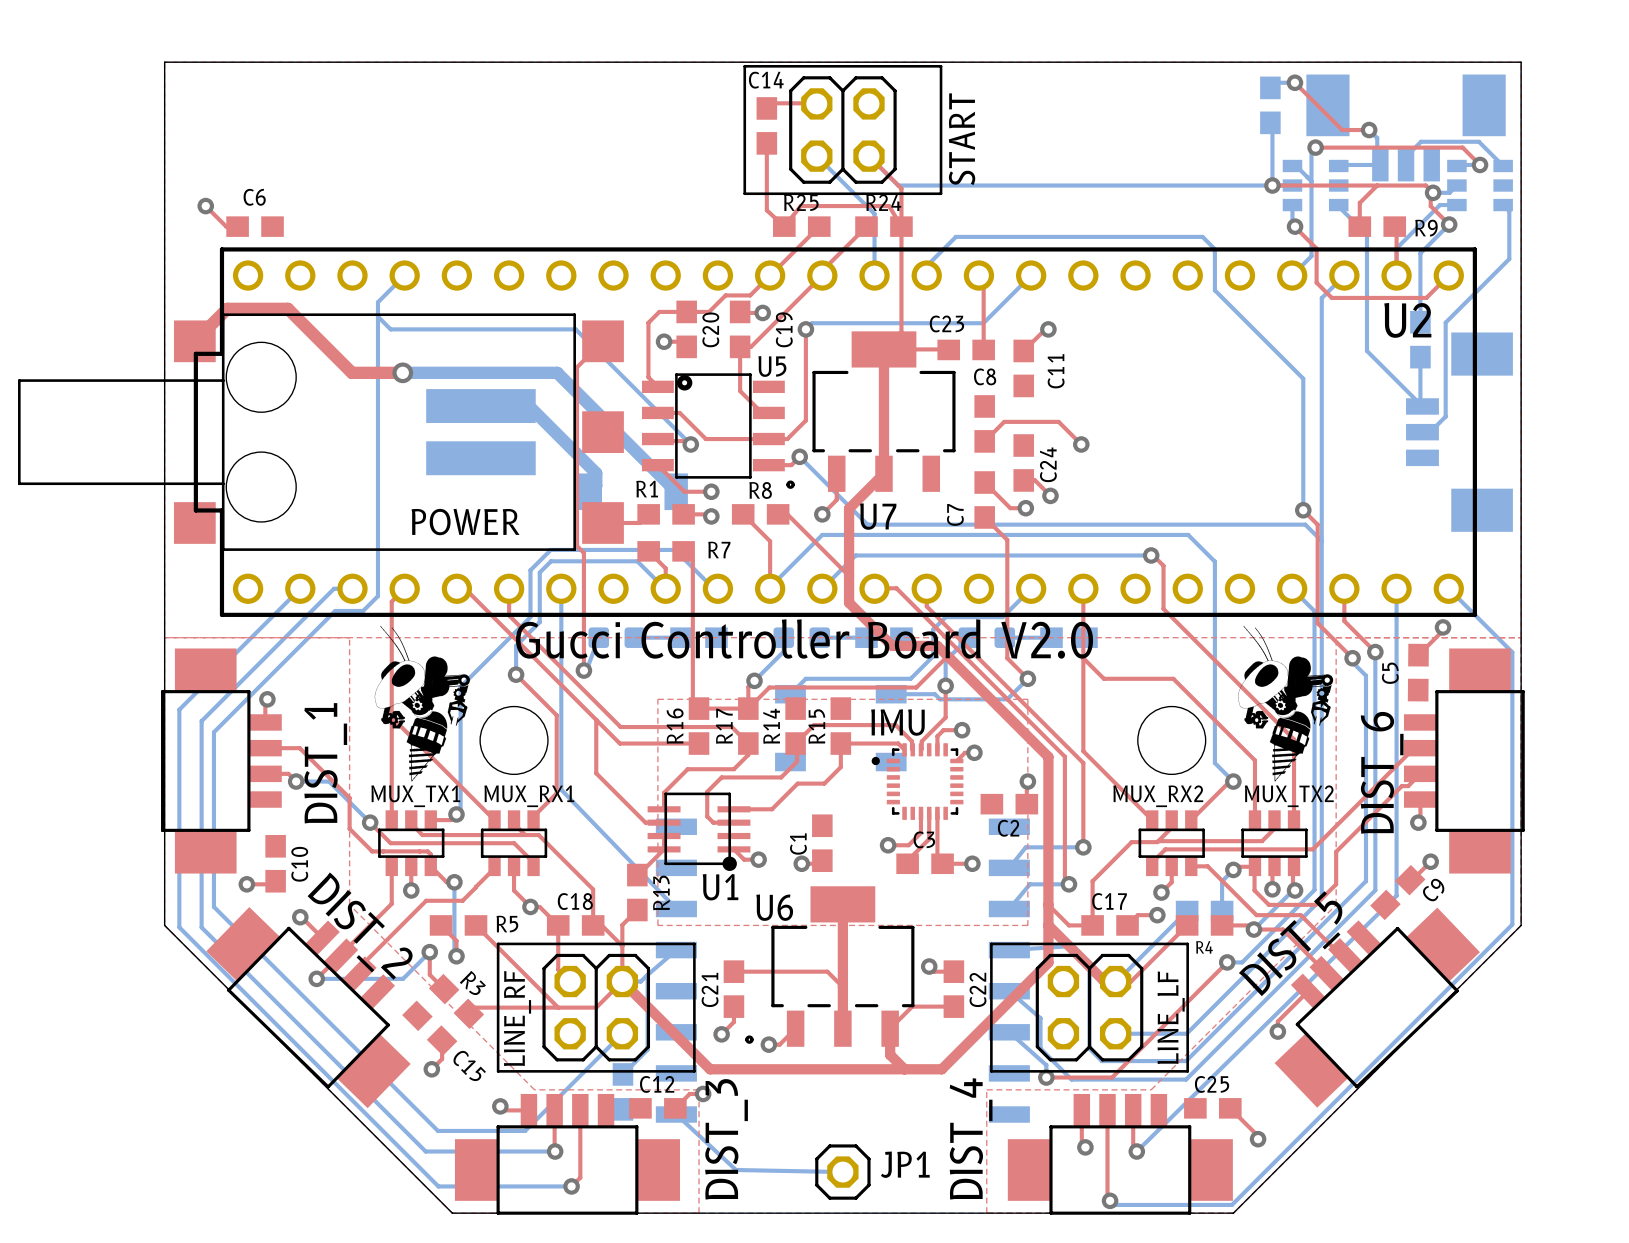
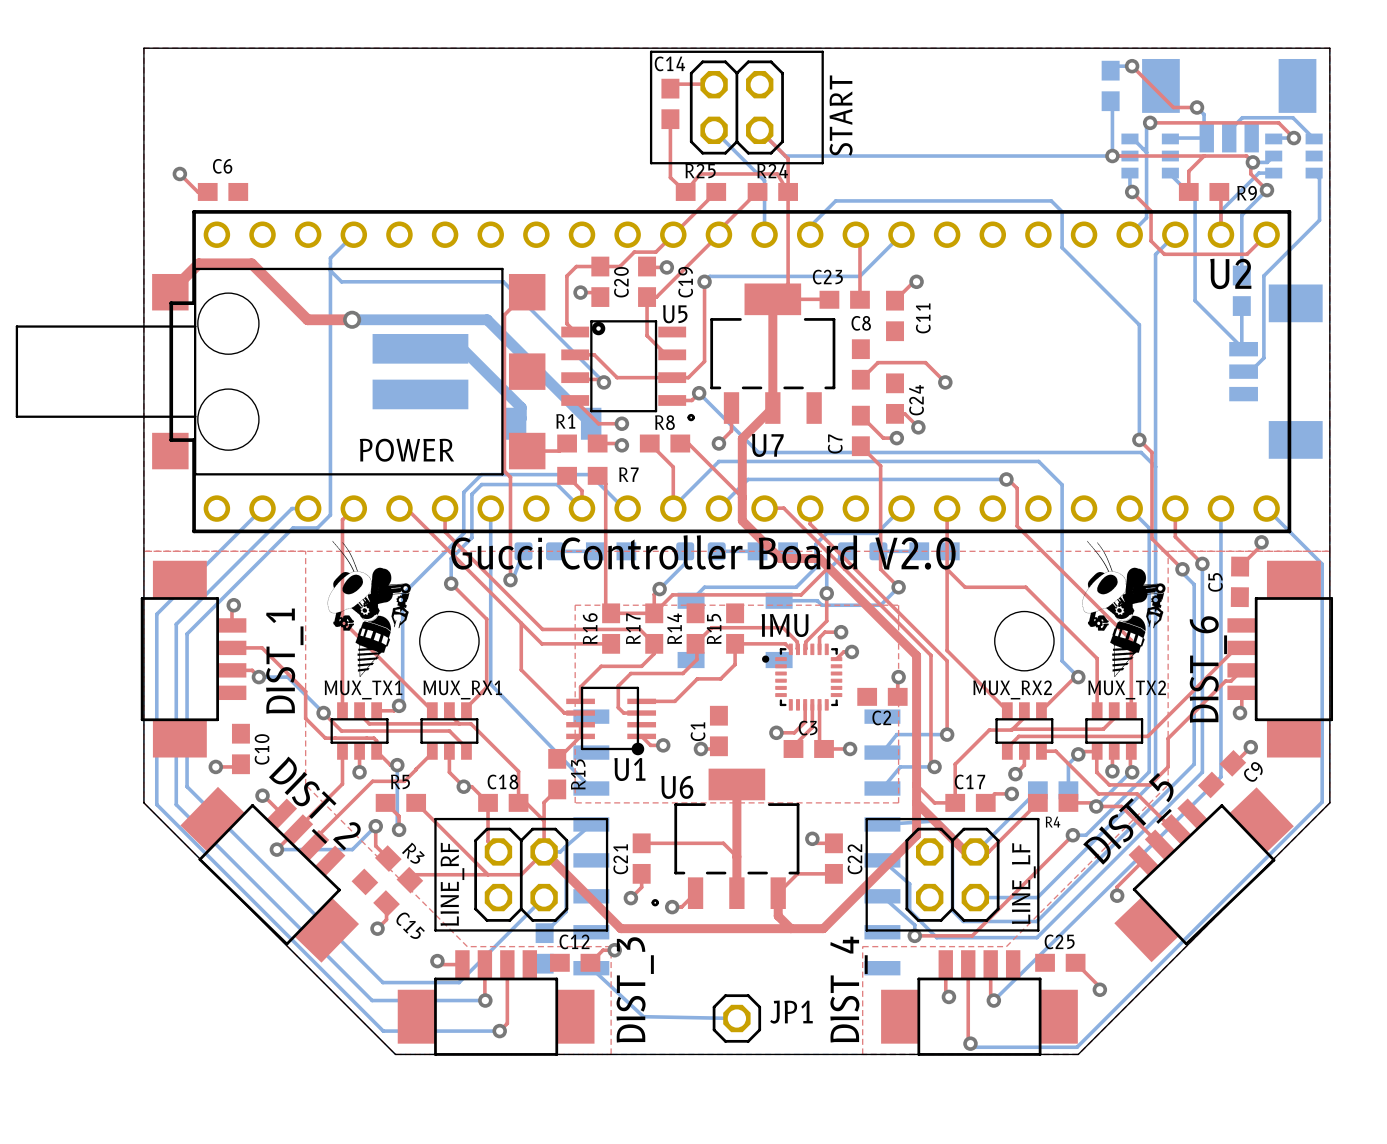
R5 name position: R5 (507, 924) -> R5 (400, 781)

